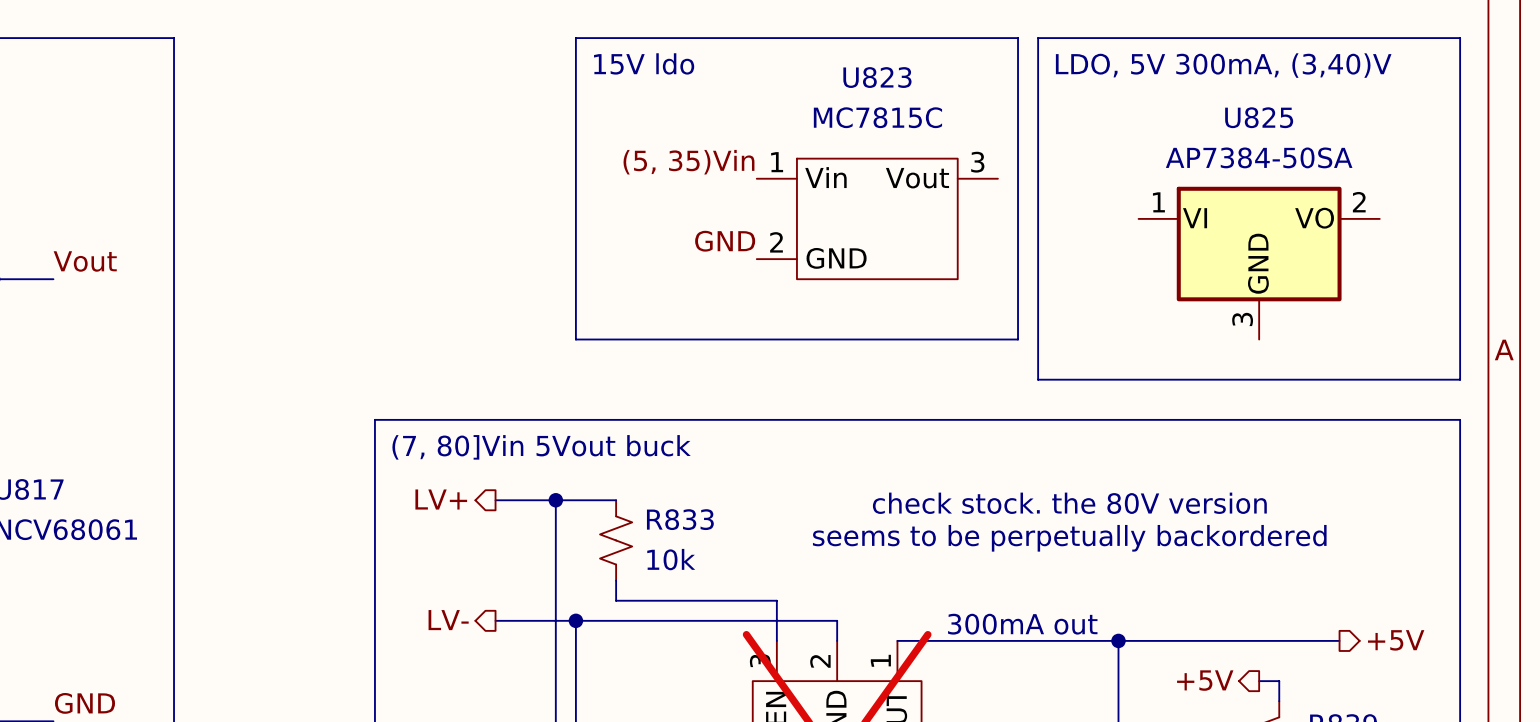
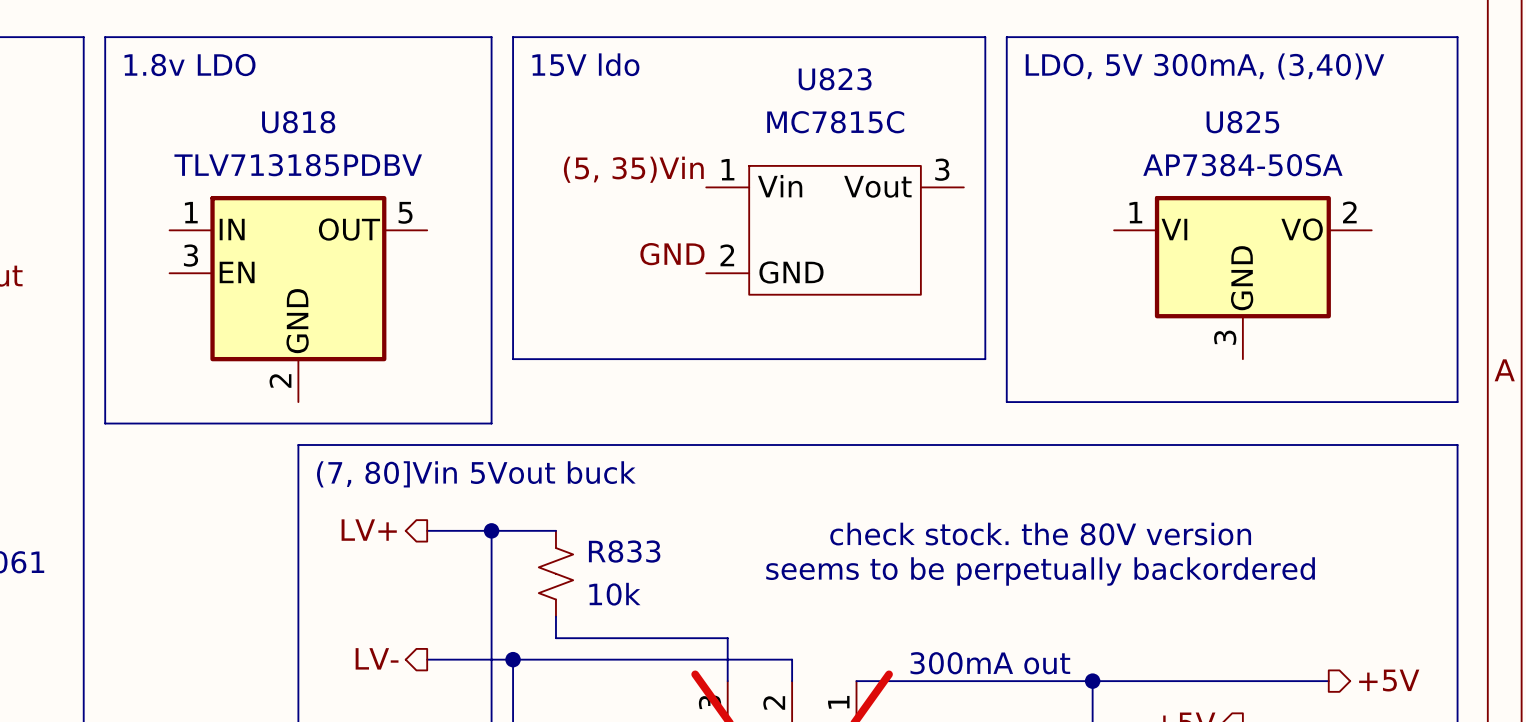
line: none -> (105, 37) (491, 37) (491, 423) (105, 423) (105, 37)
text: none -> 1.8v LDO (190, 65)
U818: none -> TLV713185PDBV (298, 299)

